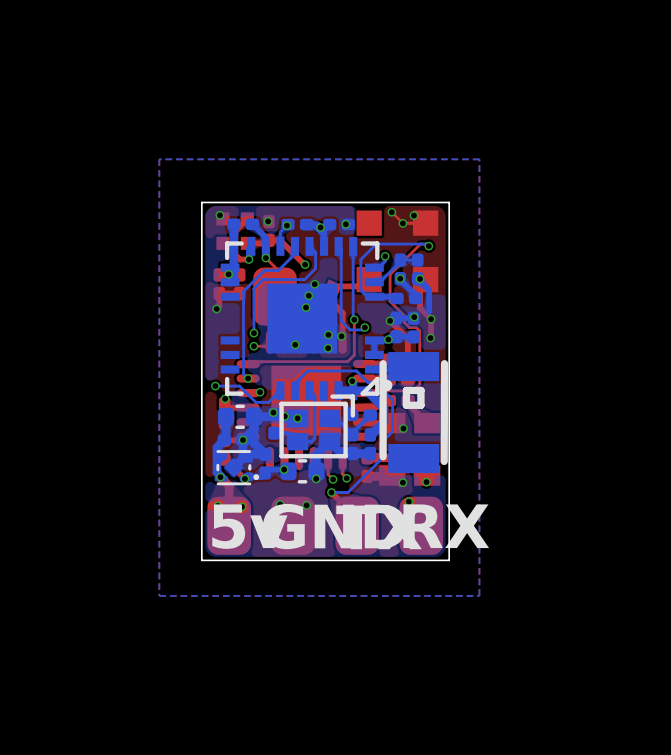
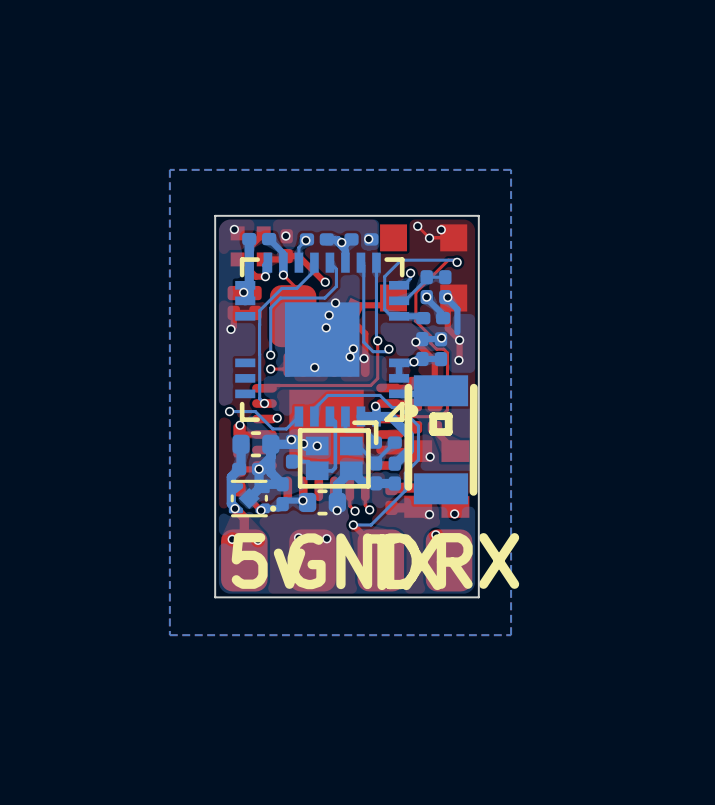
via position: (328, 348) -> (353, 348)

